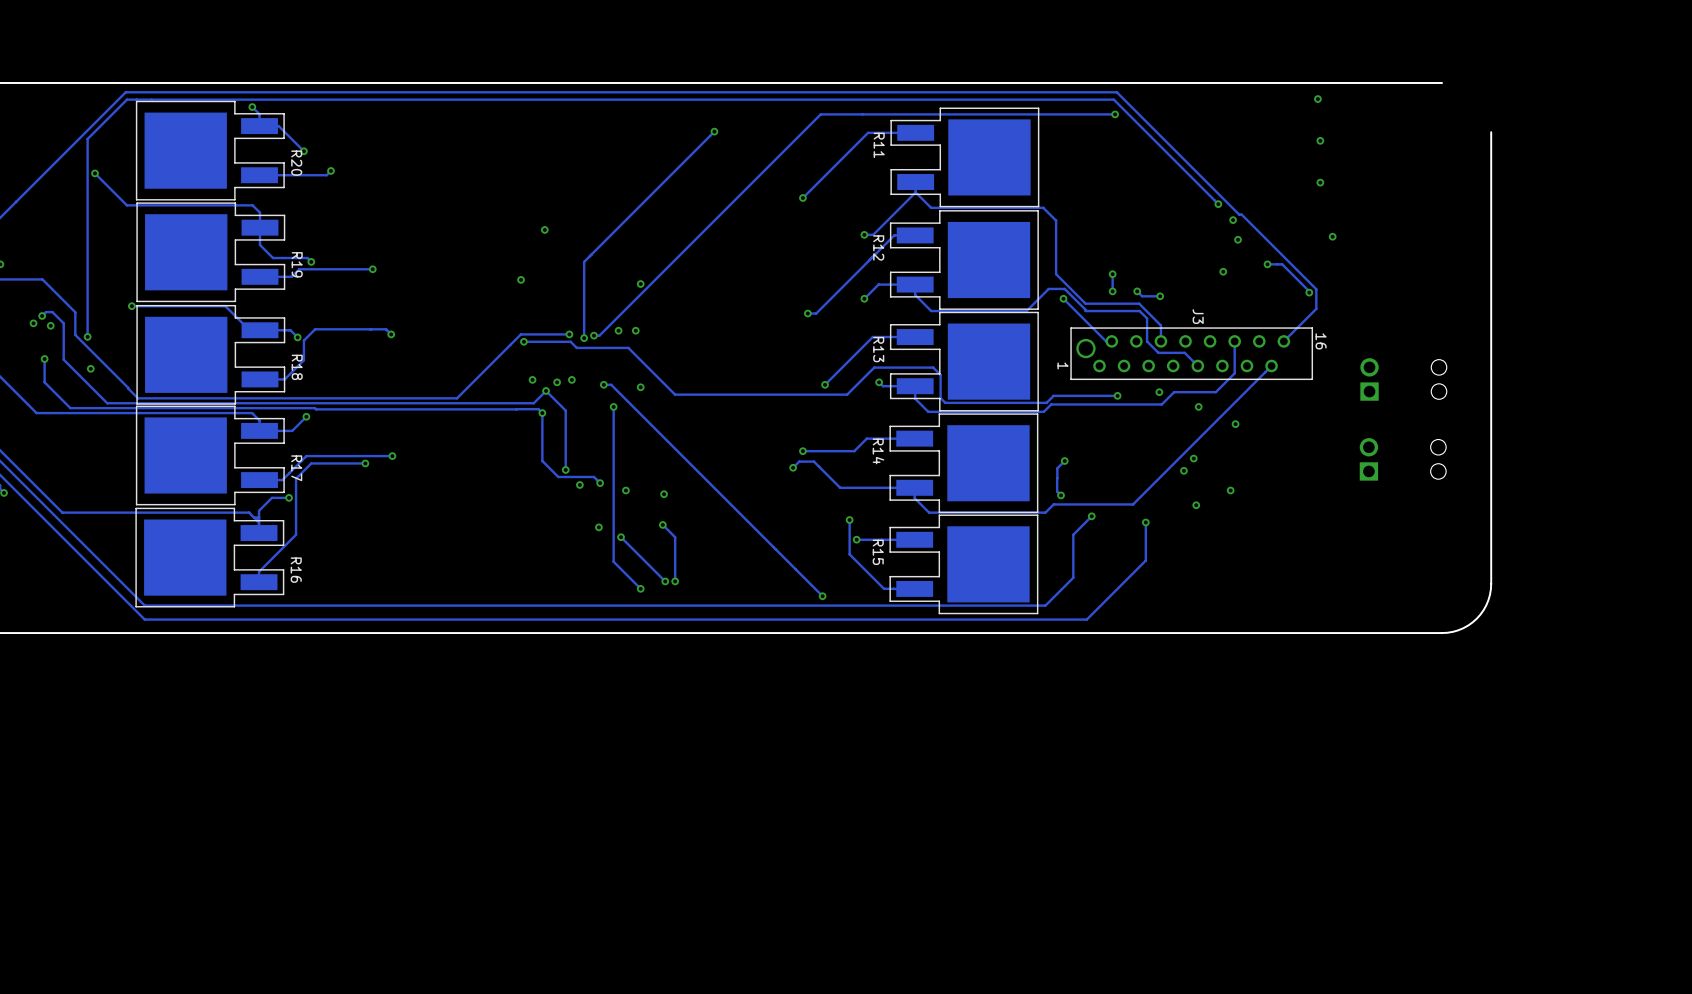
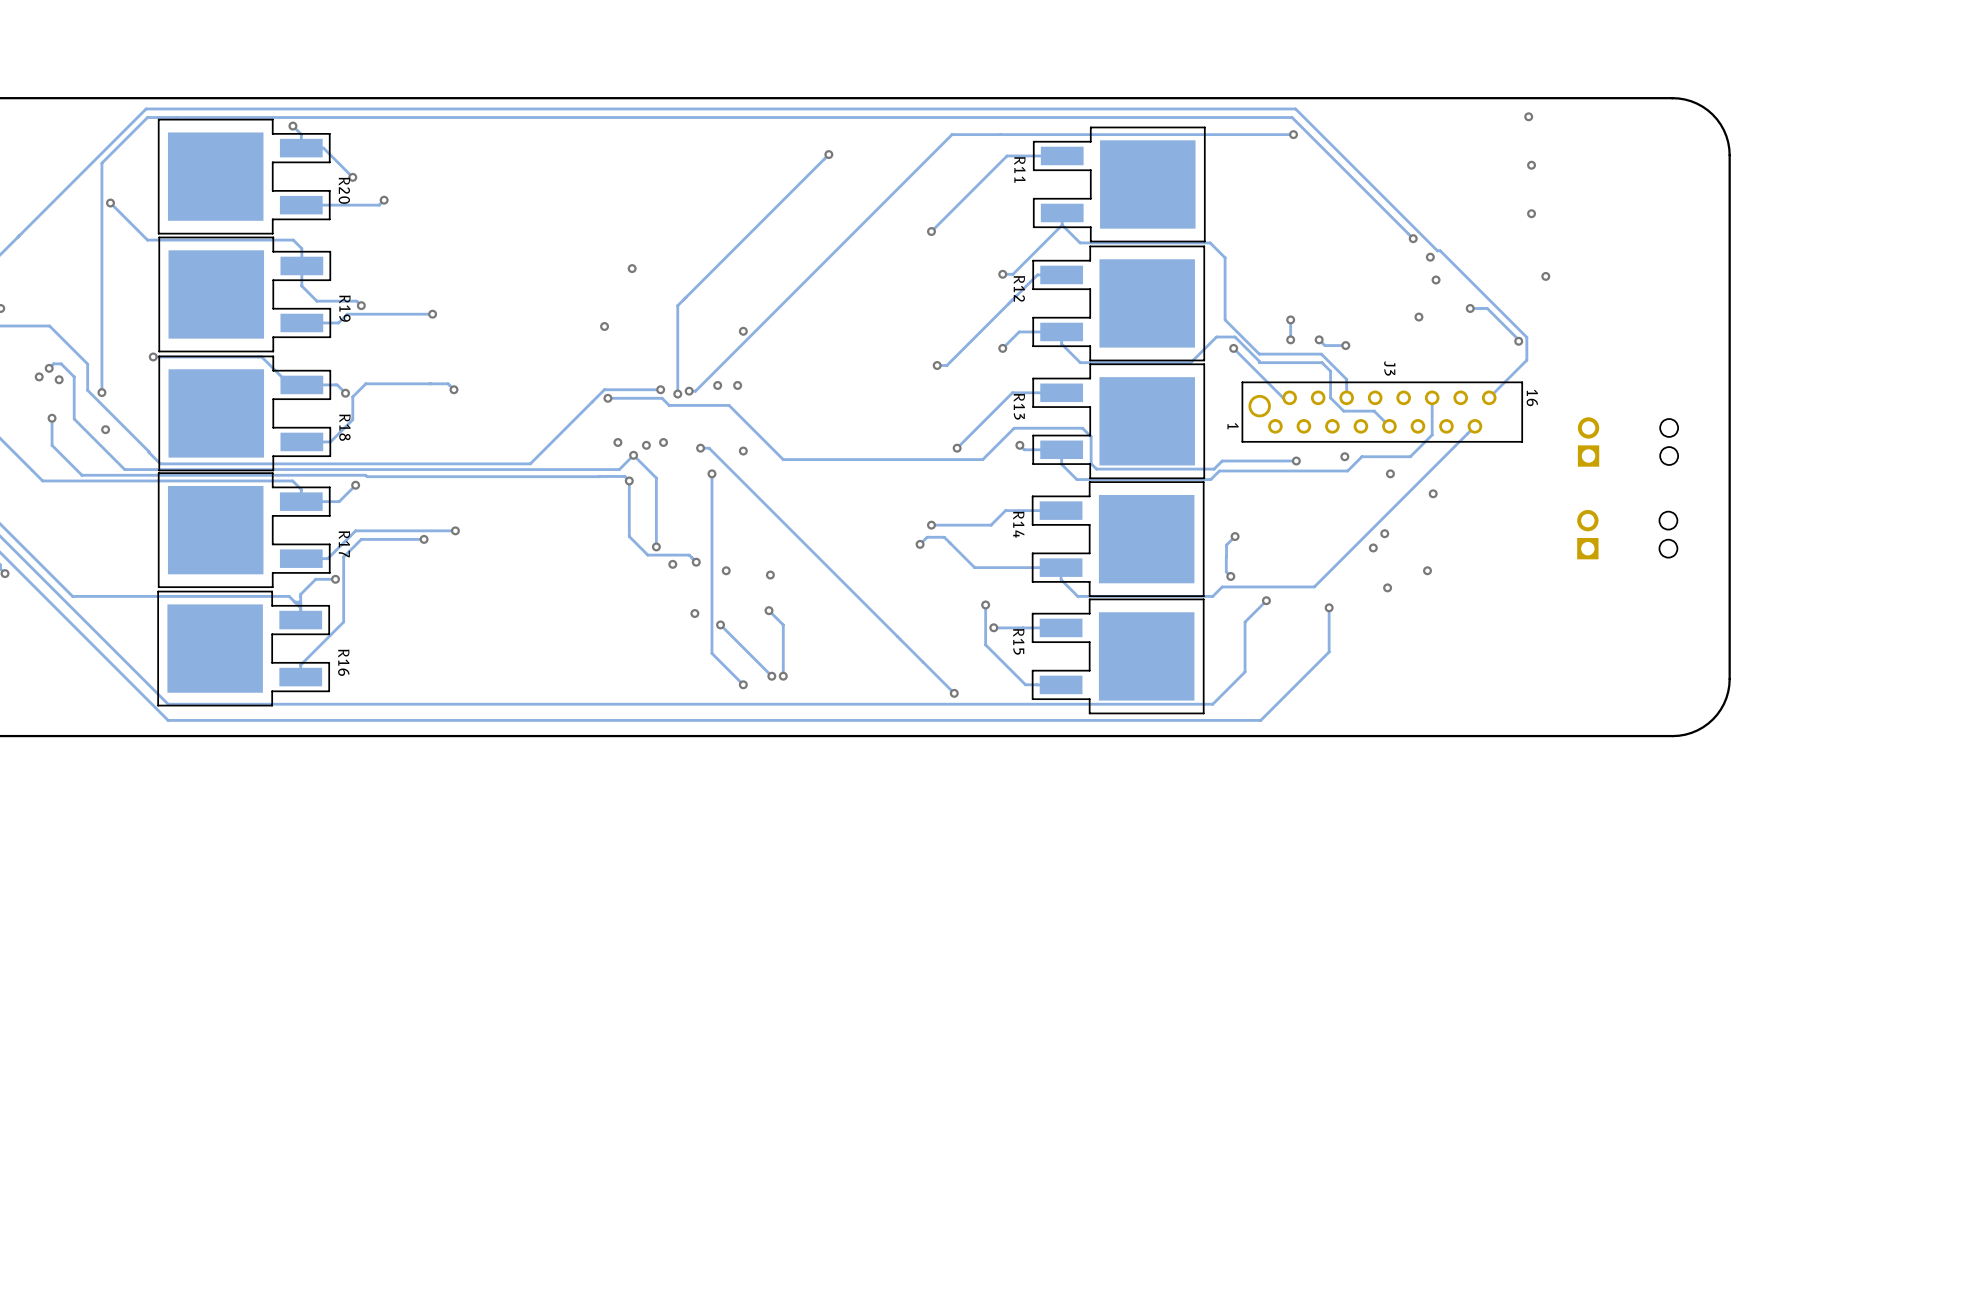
board edge: none -> (1671, 98) (1690, 101) (1712, 114) (1723, 130) (1729, 155)

